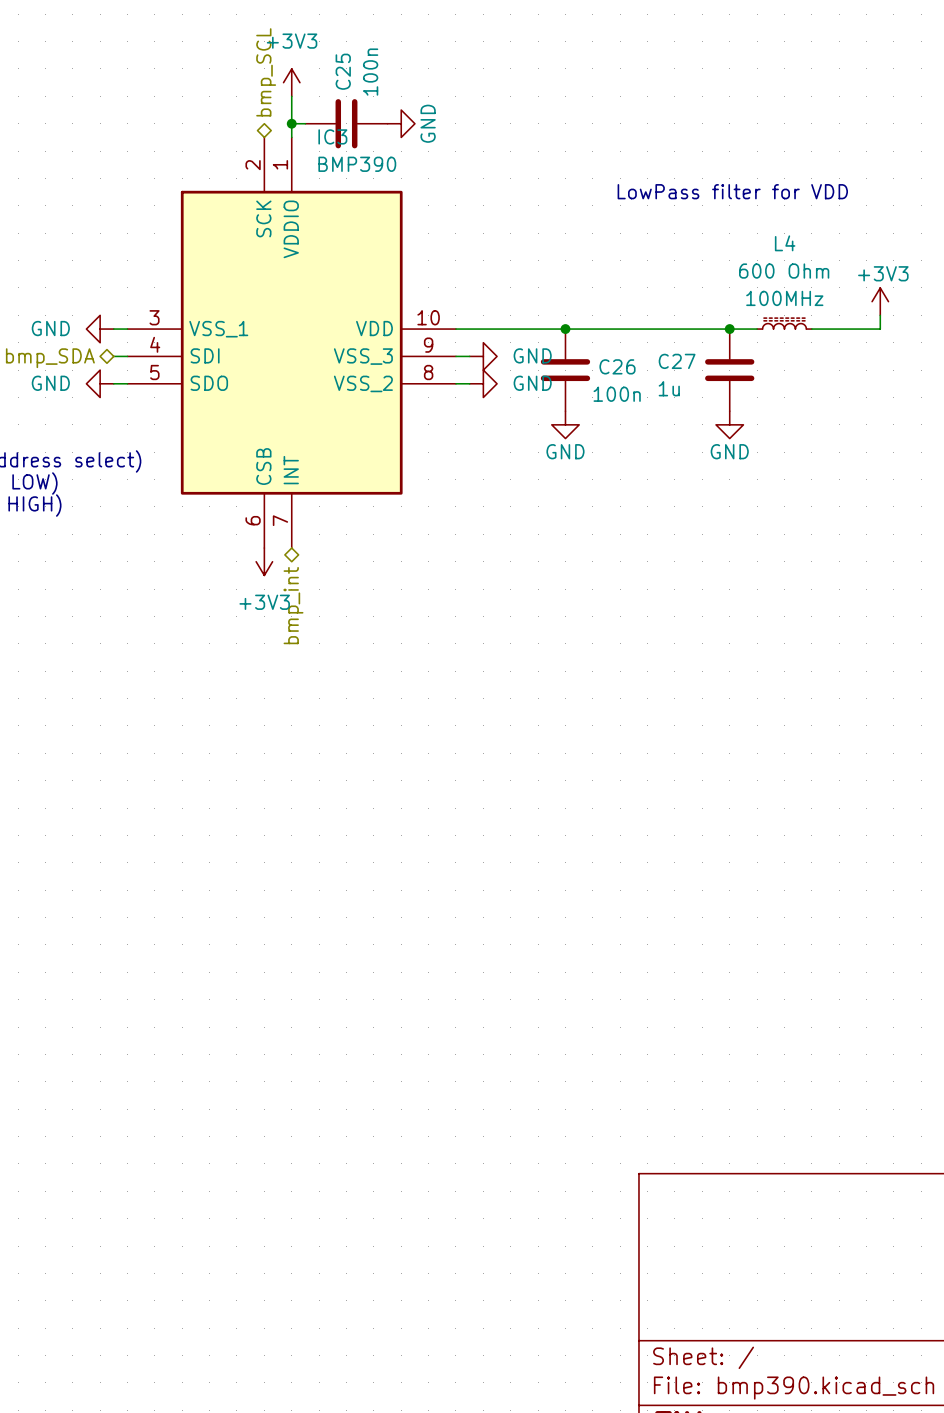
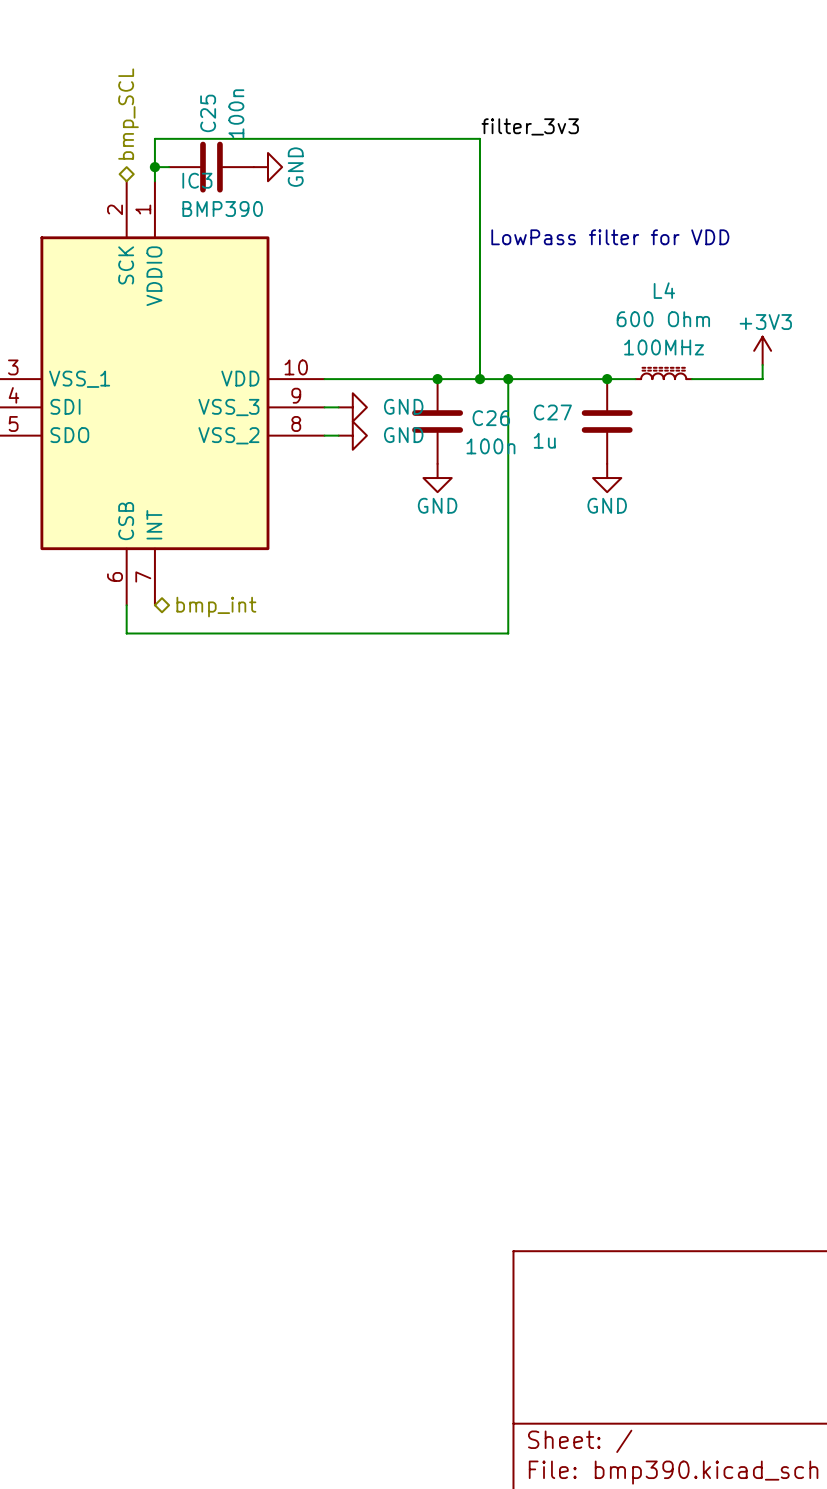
power symbol: +3V3 (291, 82) -> none
label: none -> filter_3v3 (530, 126)
wire: none -> (154, 138) (479, 138) (479, 379)
junction: none -> (479, 379)
wire: none -> (508, 379) (508, 633) (126, 633) (126, 605)
junction: none -> (508, 379)
power symbol: +3V3 (264, 561) -> none
hierarchical label rotation: 0° (293, 605) -> 90° counterclockwise (216, 607)

